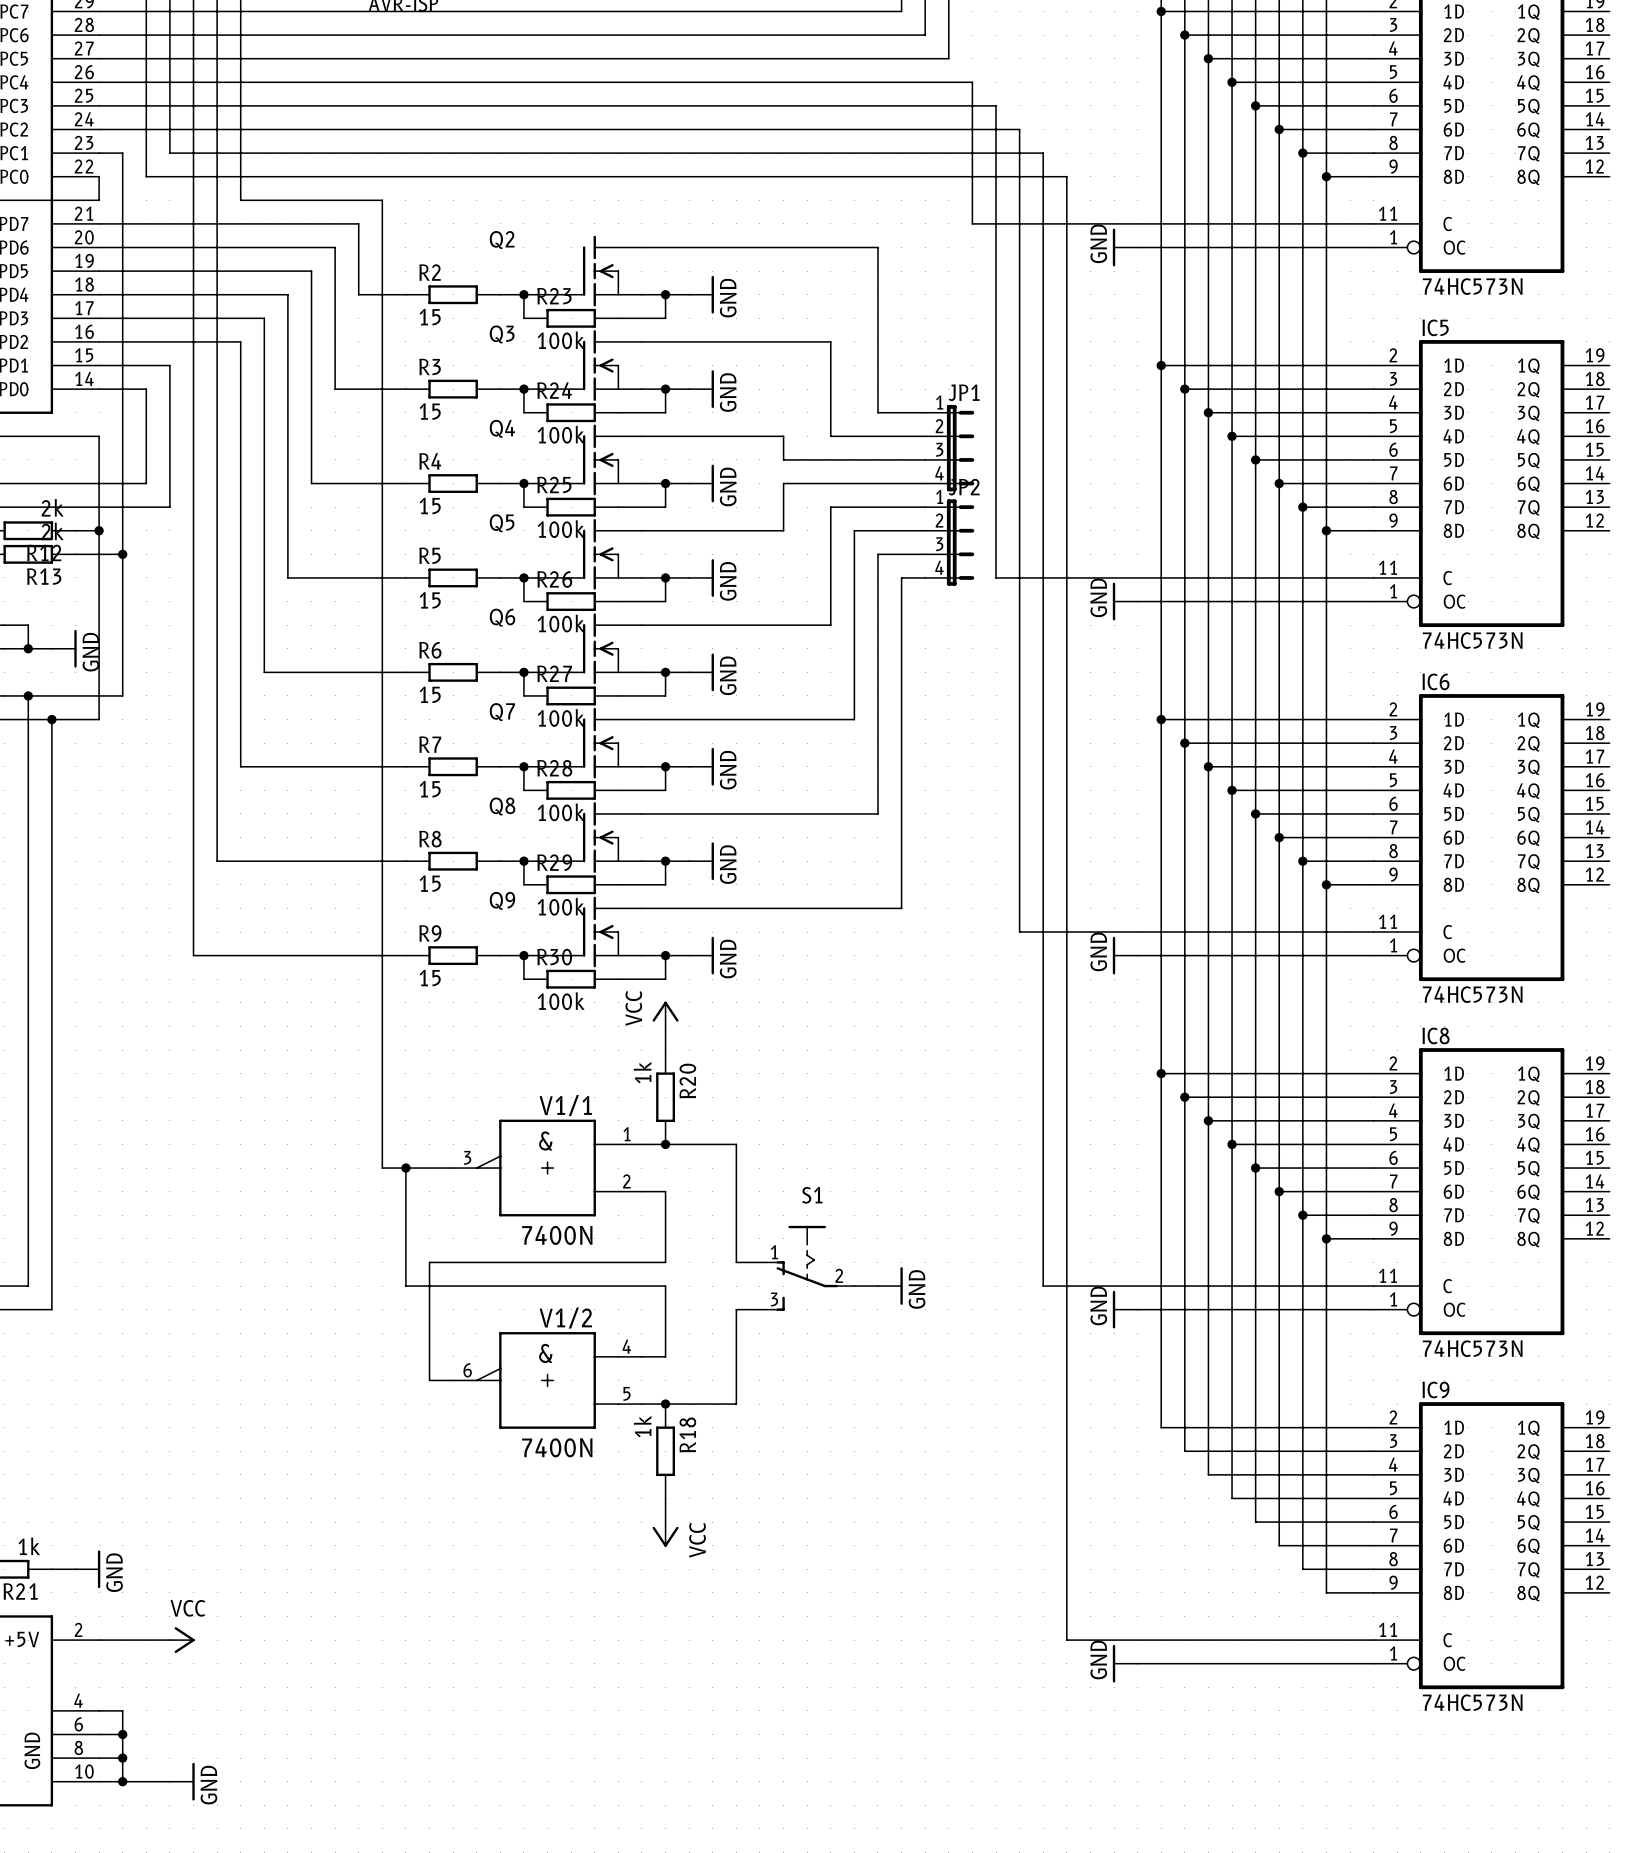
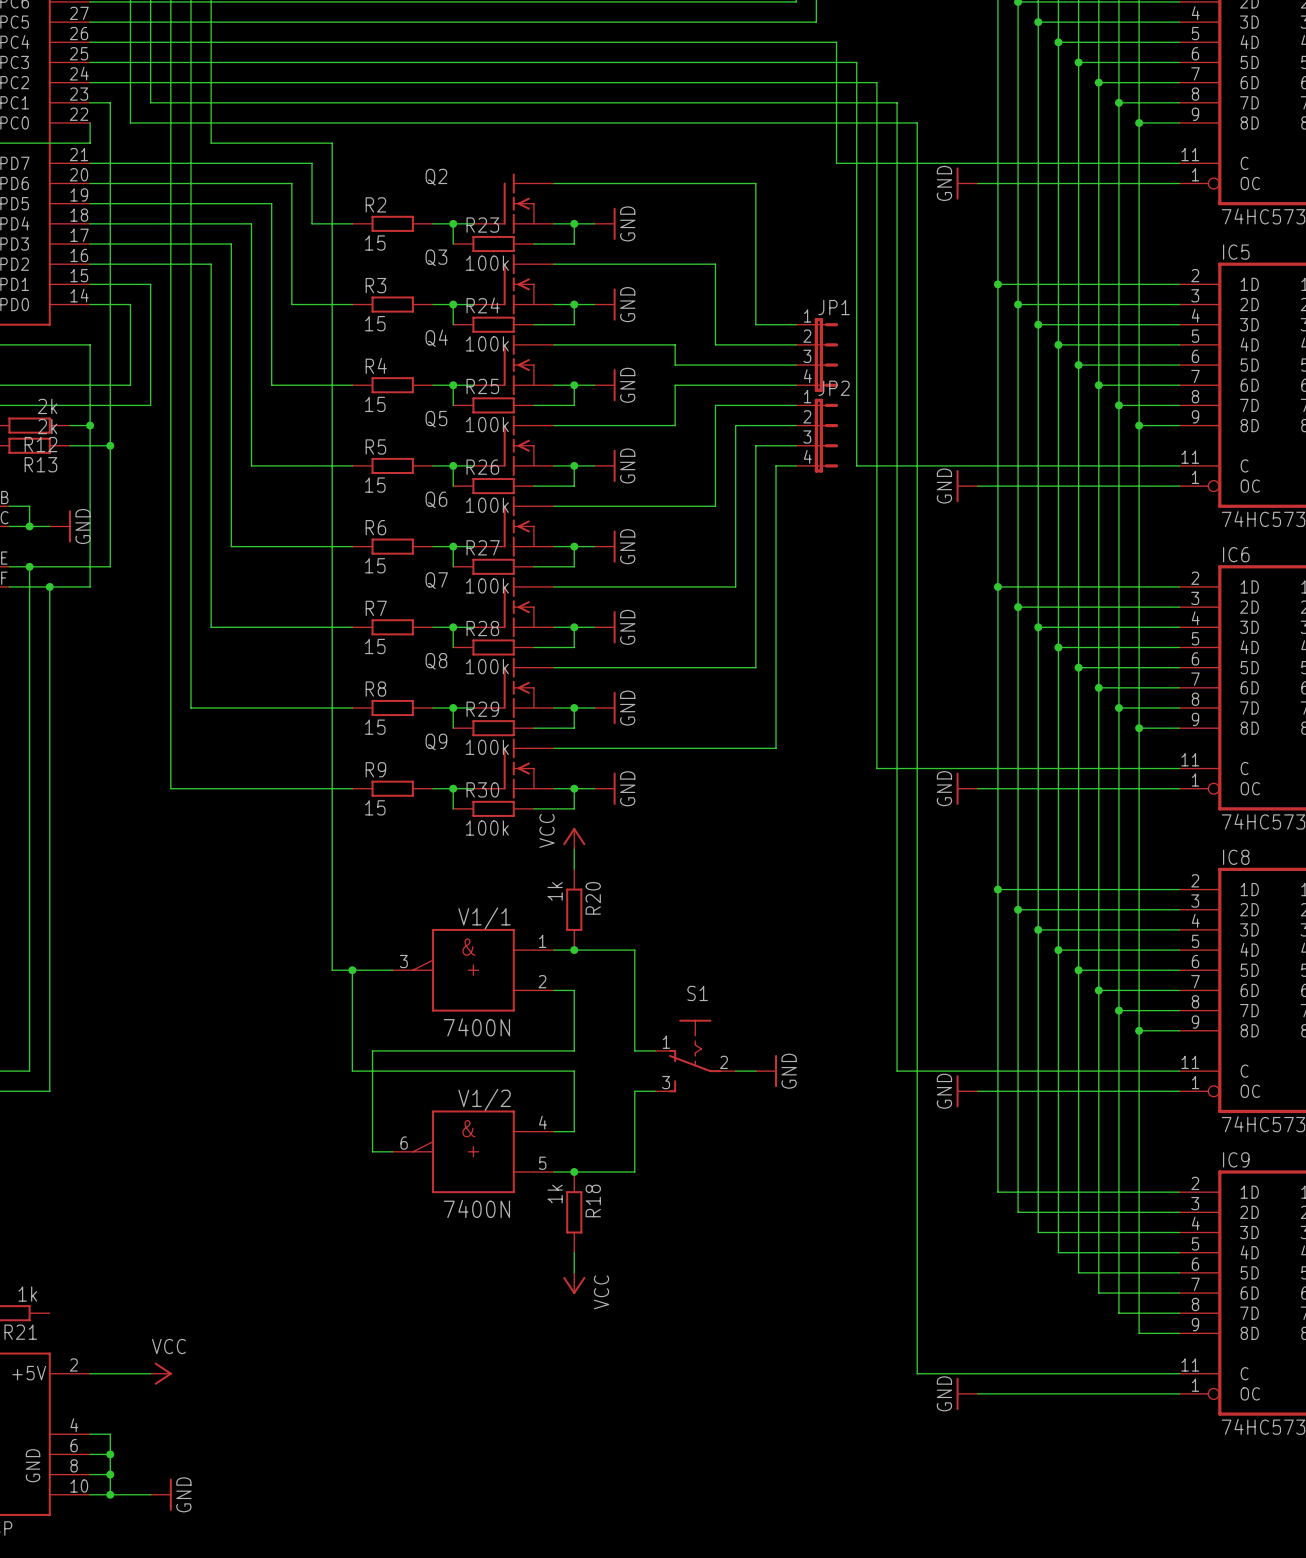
wire: (51, 1569) (75, 1569) -> none
power symbol: GND (87, 1569) -> none

